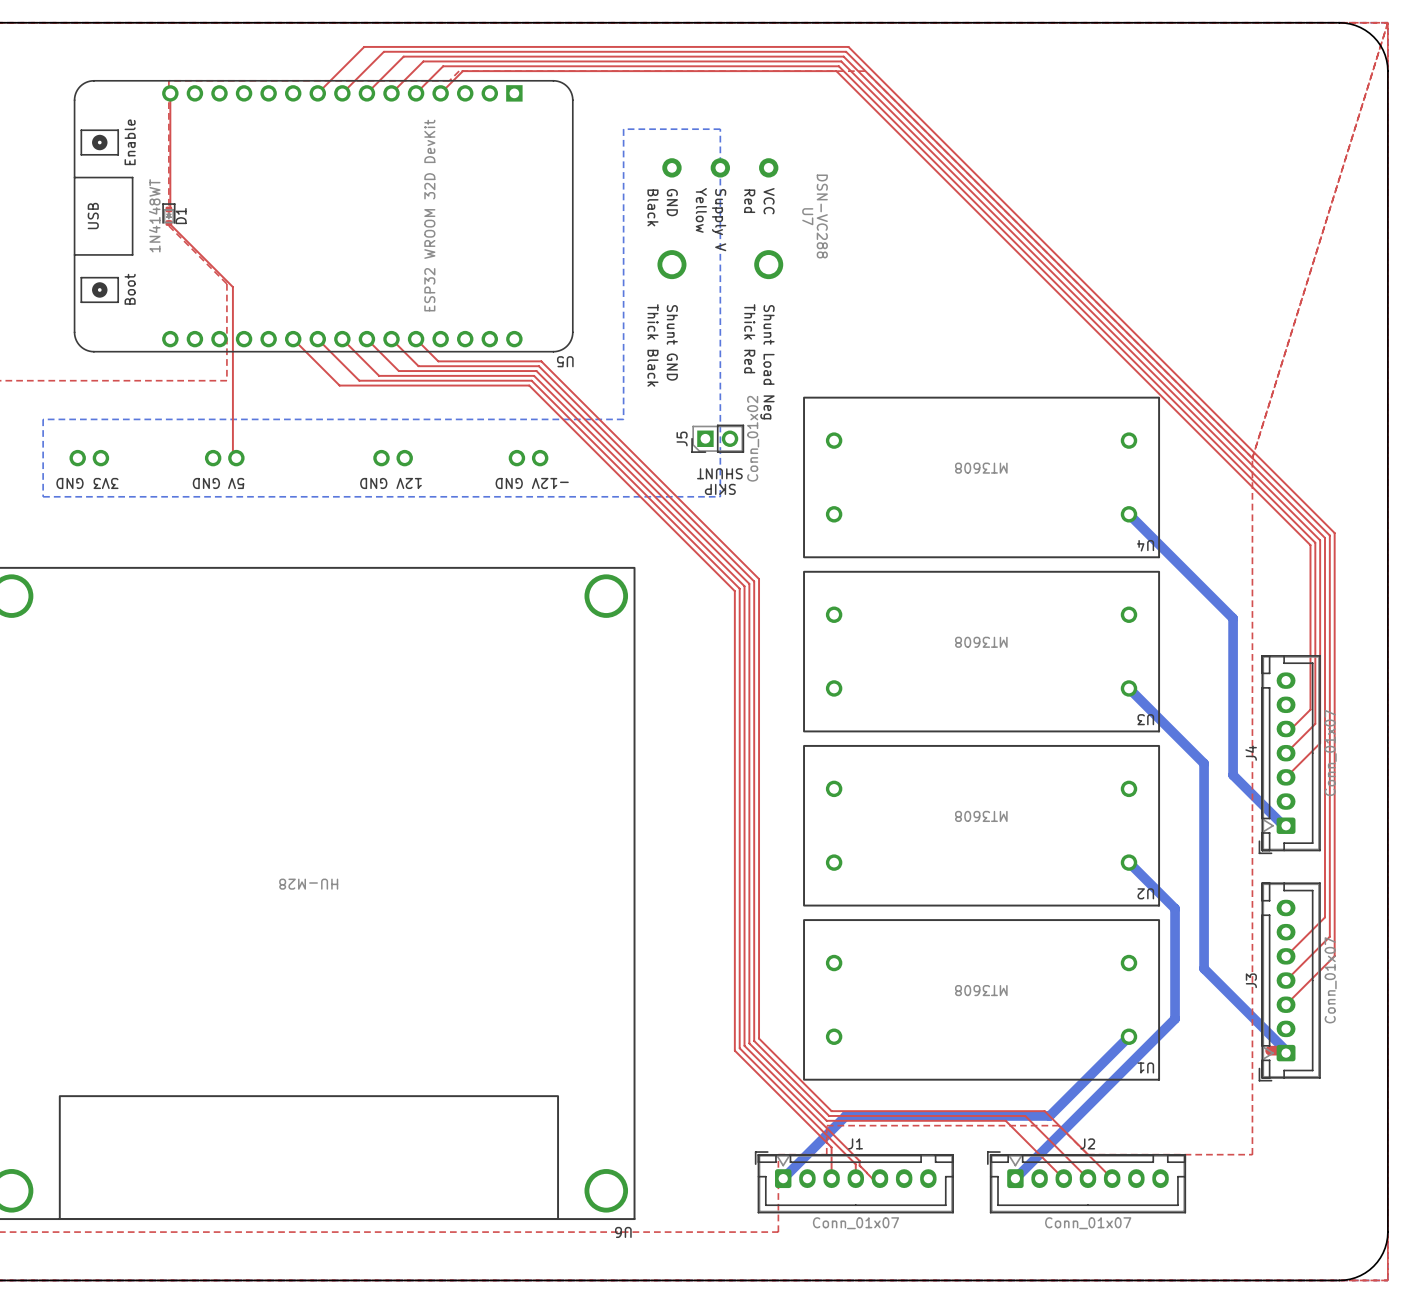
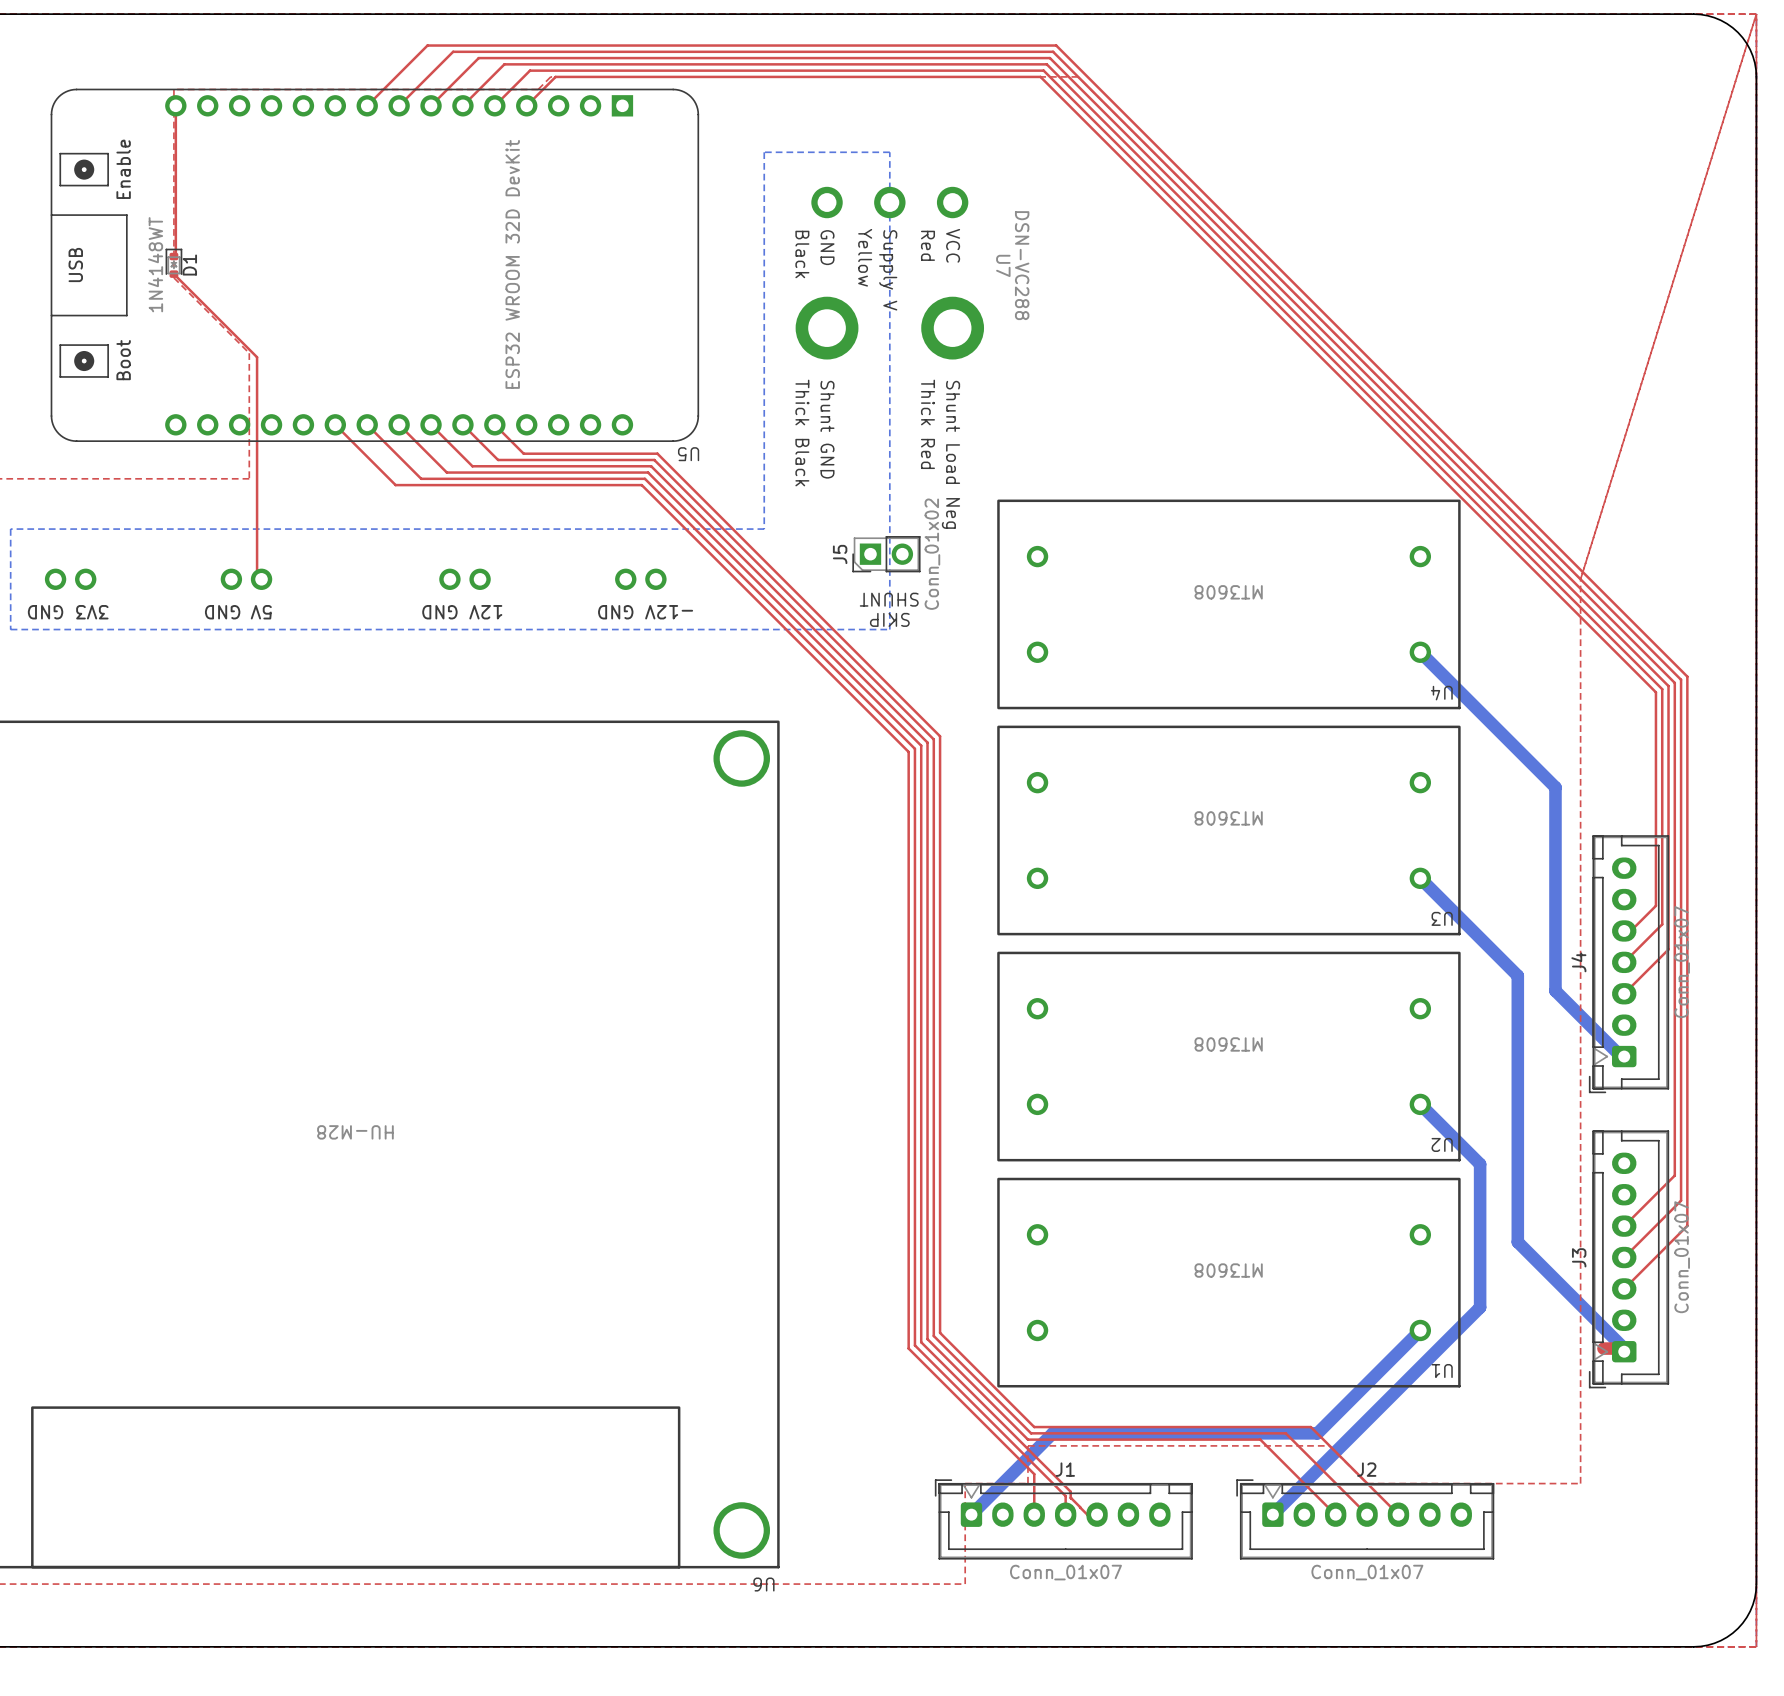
U7 footprint: [657, 158, 784, 280] -> [795, 186, 985, 360]

